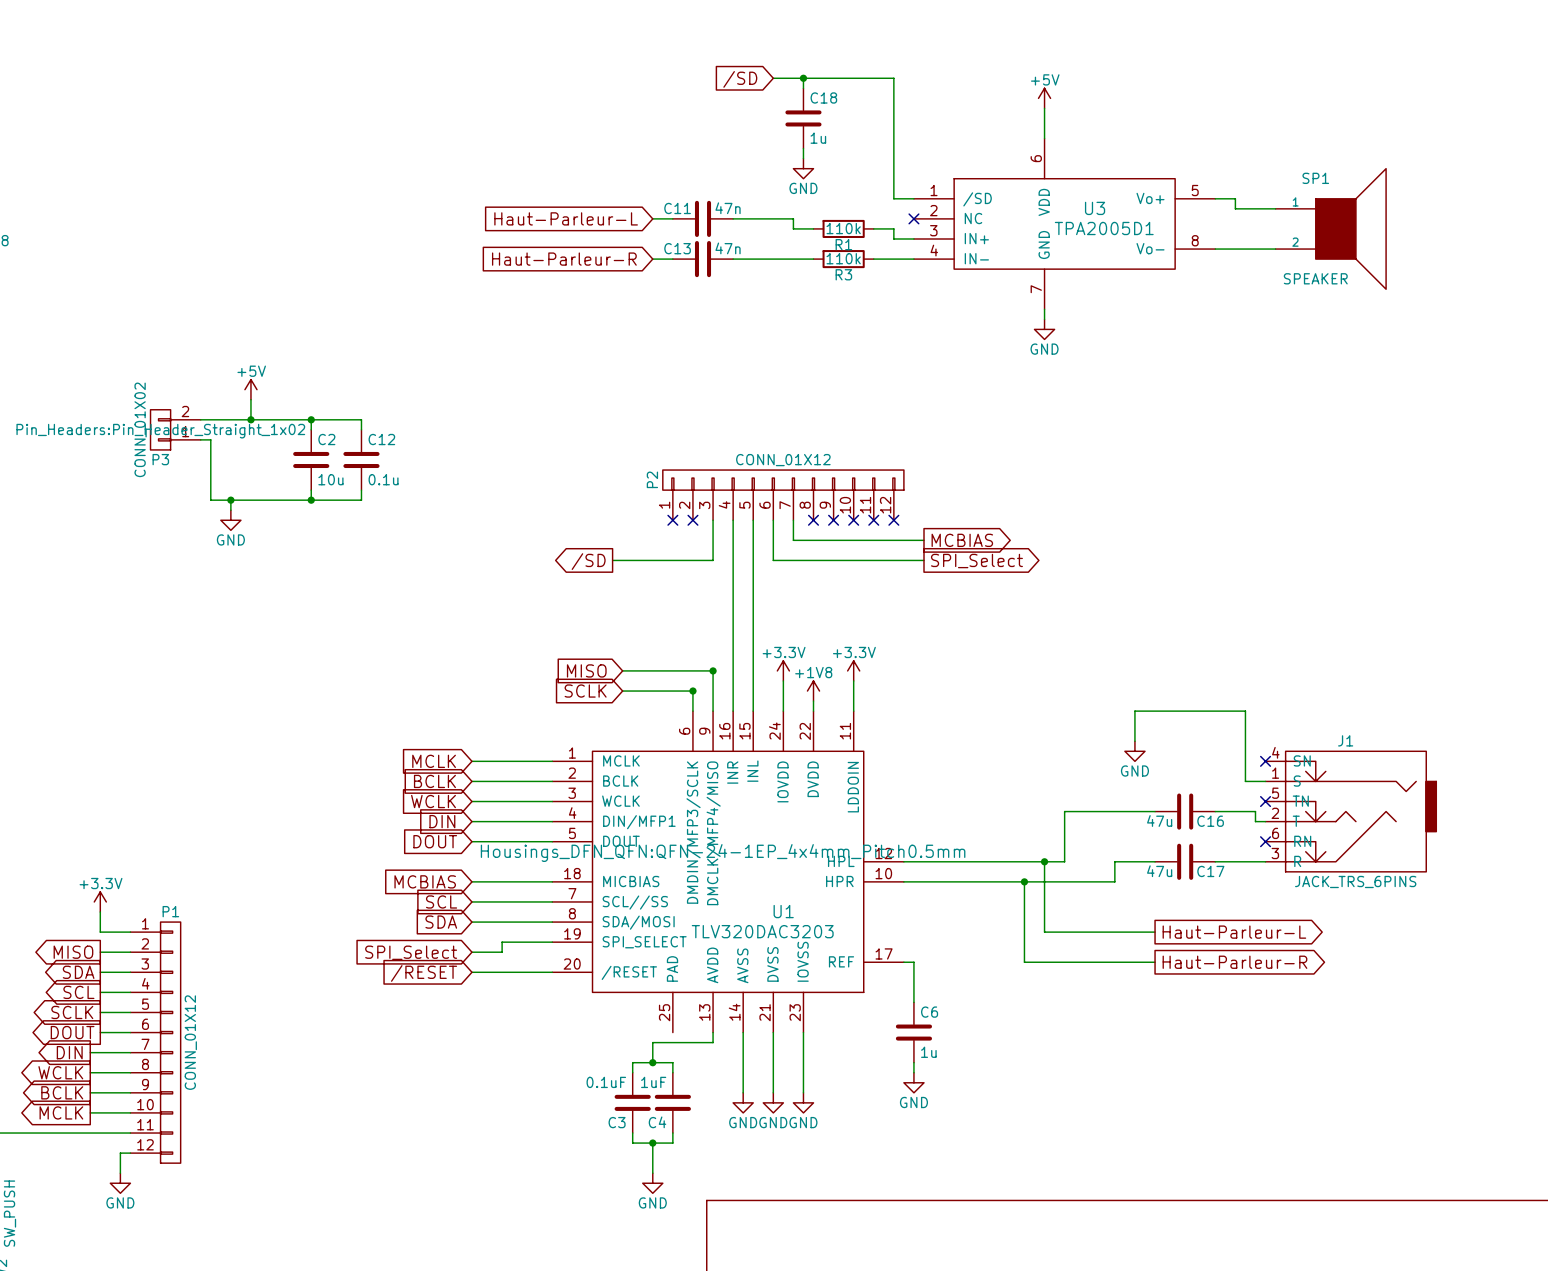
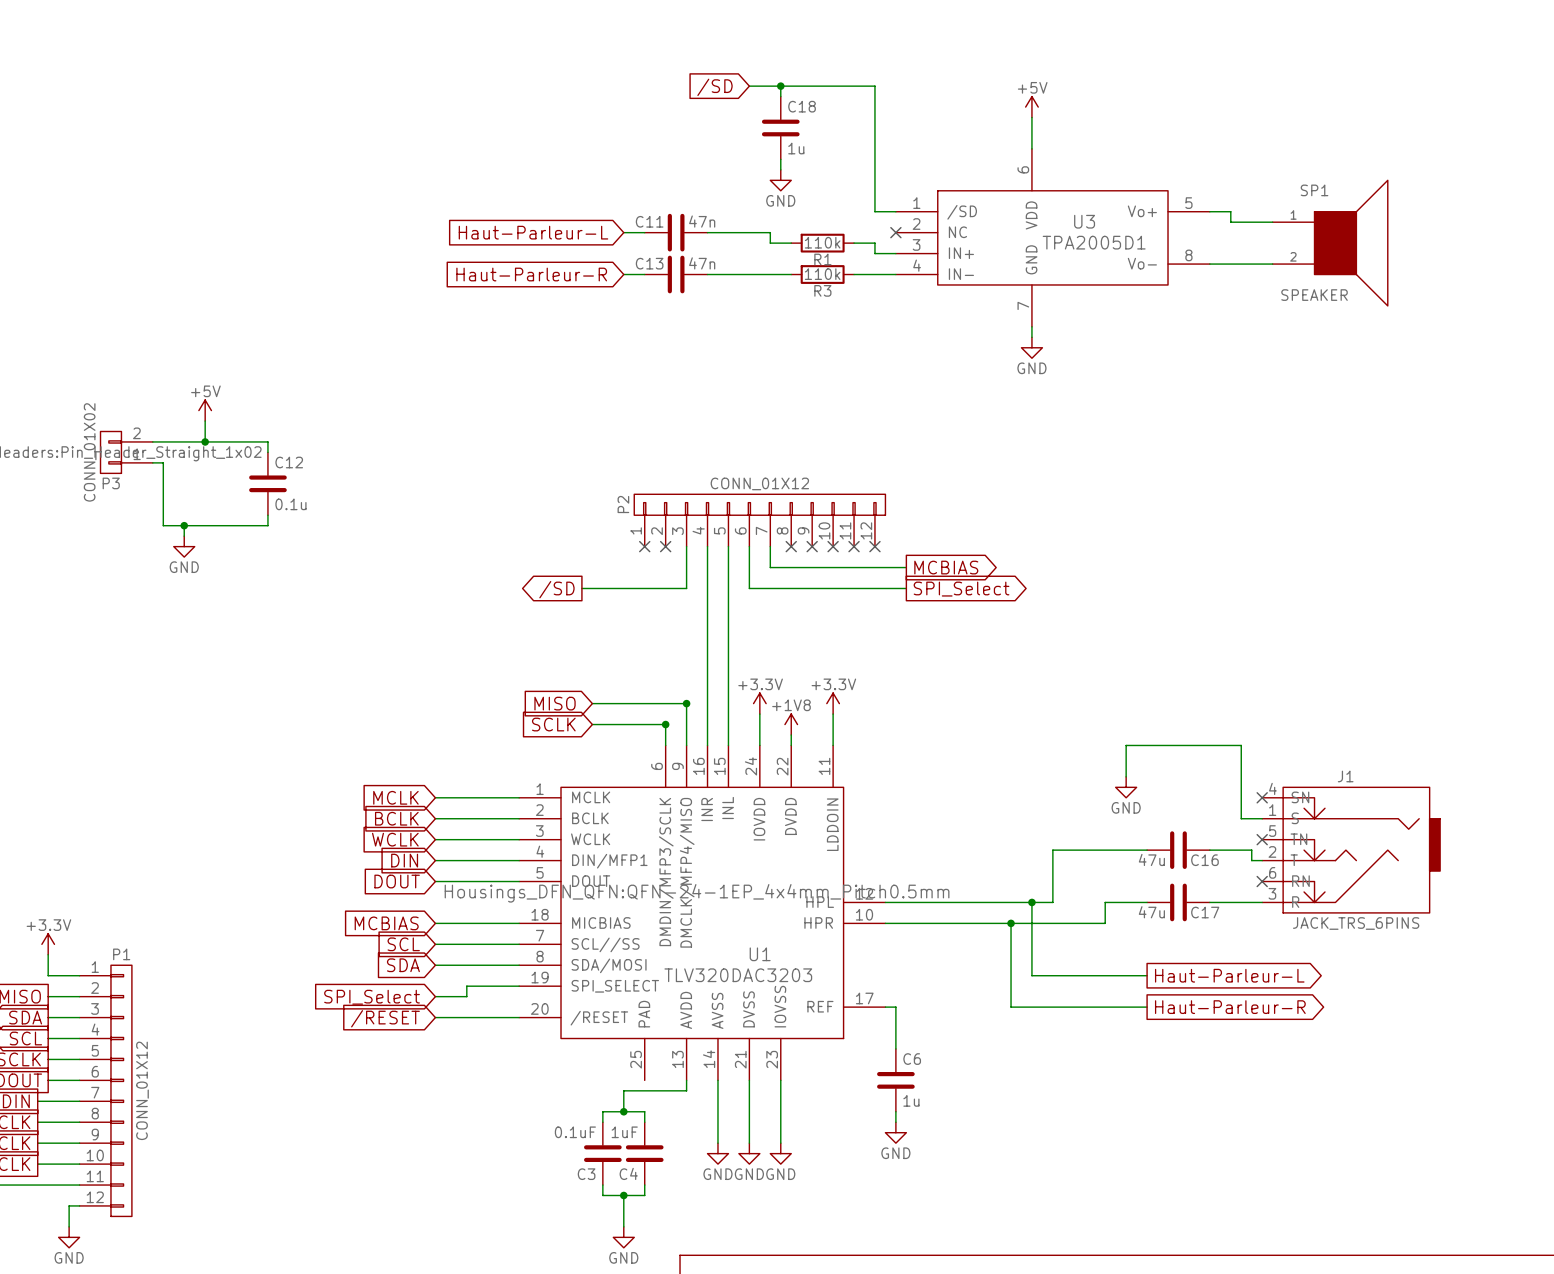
wire: (311, 419) (361, 419) (361, 429) -> none
junction: (311, 419) -> none
C2 name: C2 (326, 439) -> C12 (289, 462)
C12: 0.1u (361, 459) -> none
C2 value: 10u (330, 479) -> 0.1u (290, 504)
wire: (361, 490) (361, 500) (311, 500) -> none
junction: (311, 500) -> none

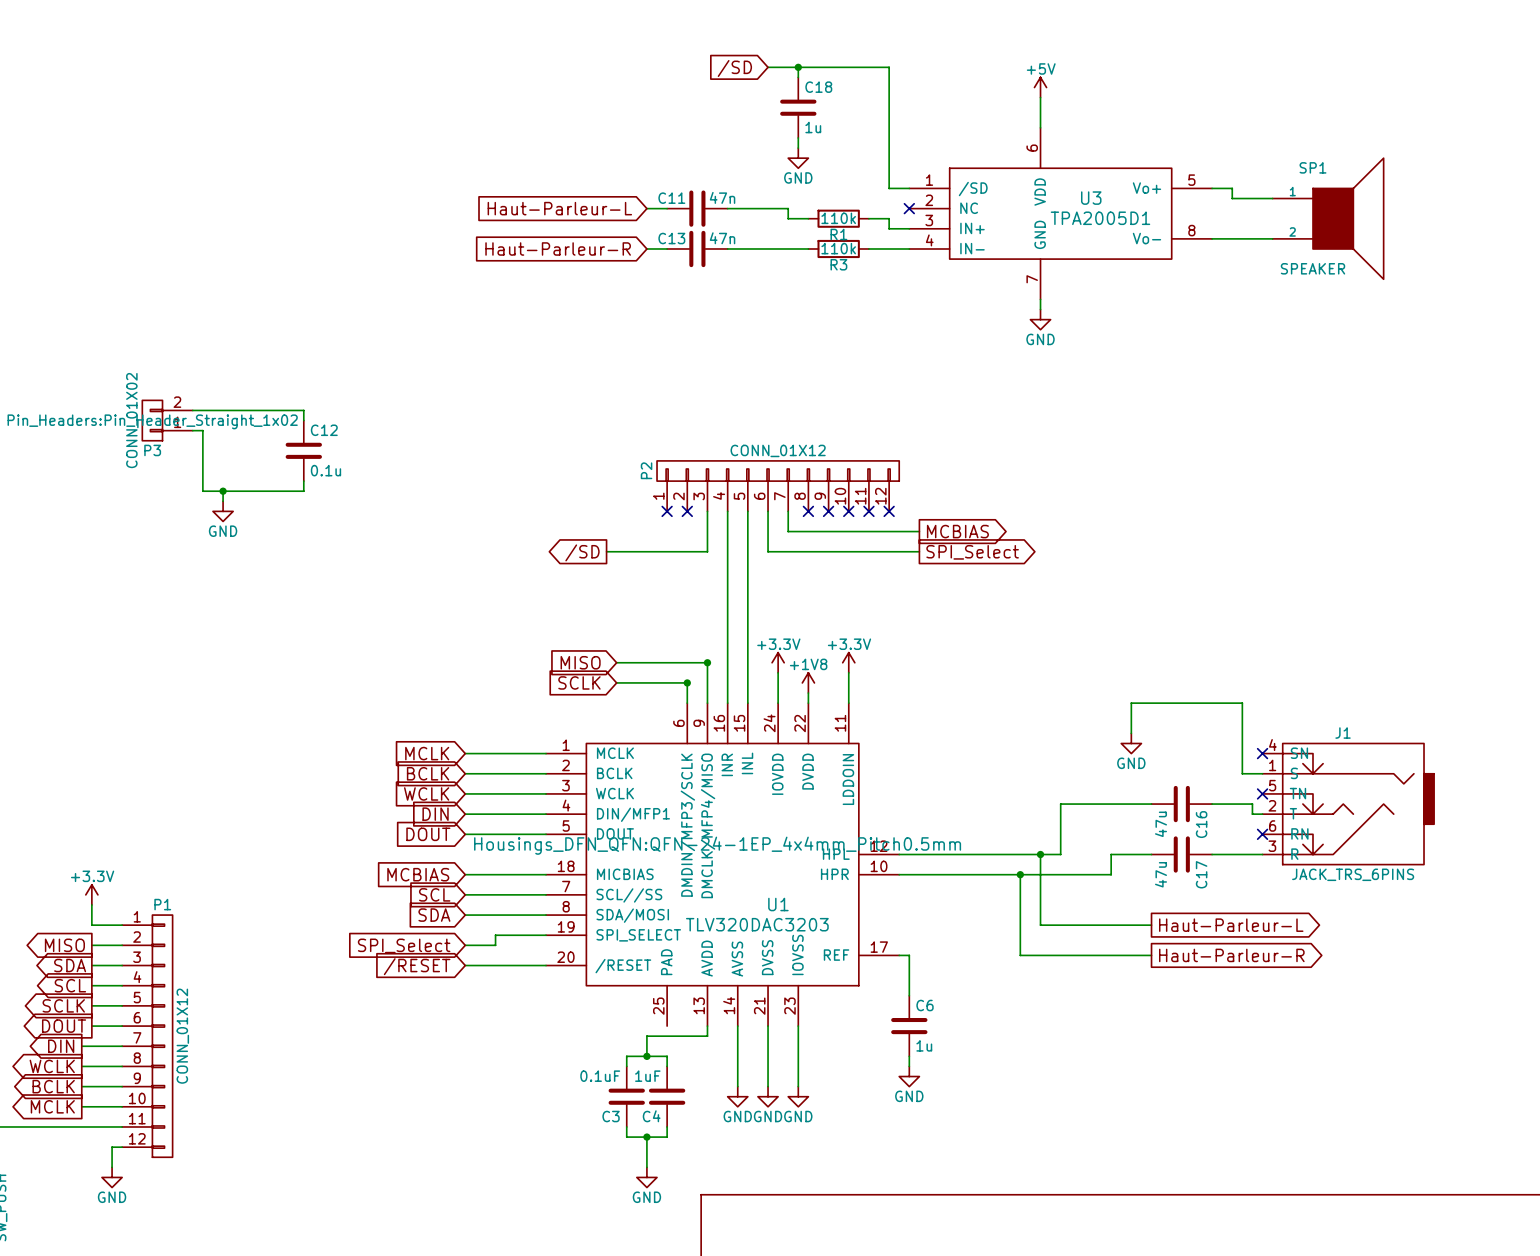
power symbol: +5V (205, 410) -> none
wire: (205, 421) (205, 441) -> none
junction: (205, 441) -> none
C16 value rotation: 0° (1151, 859) -> 90° counterclockwise (1161, 824)
C16 name rotation: 0° (1204, 860) -> 90° counterclockwise (1201, 824)
C17 value rotation: 0° (1151, 912) -> 90° counterclockwise (1161, 874)
C17 name rotation: 0° (1205, 912) -> 90° counterclockwise (1201, 874)

